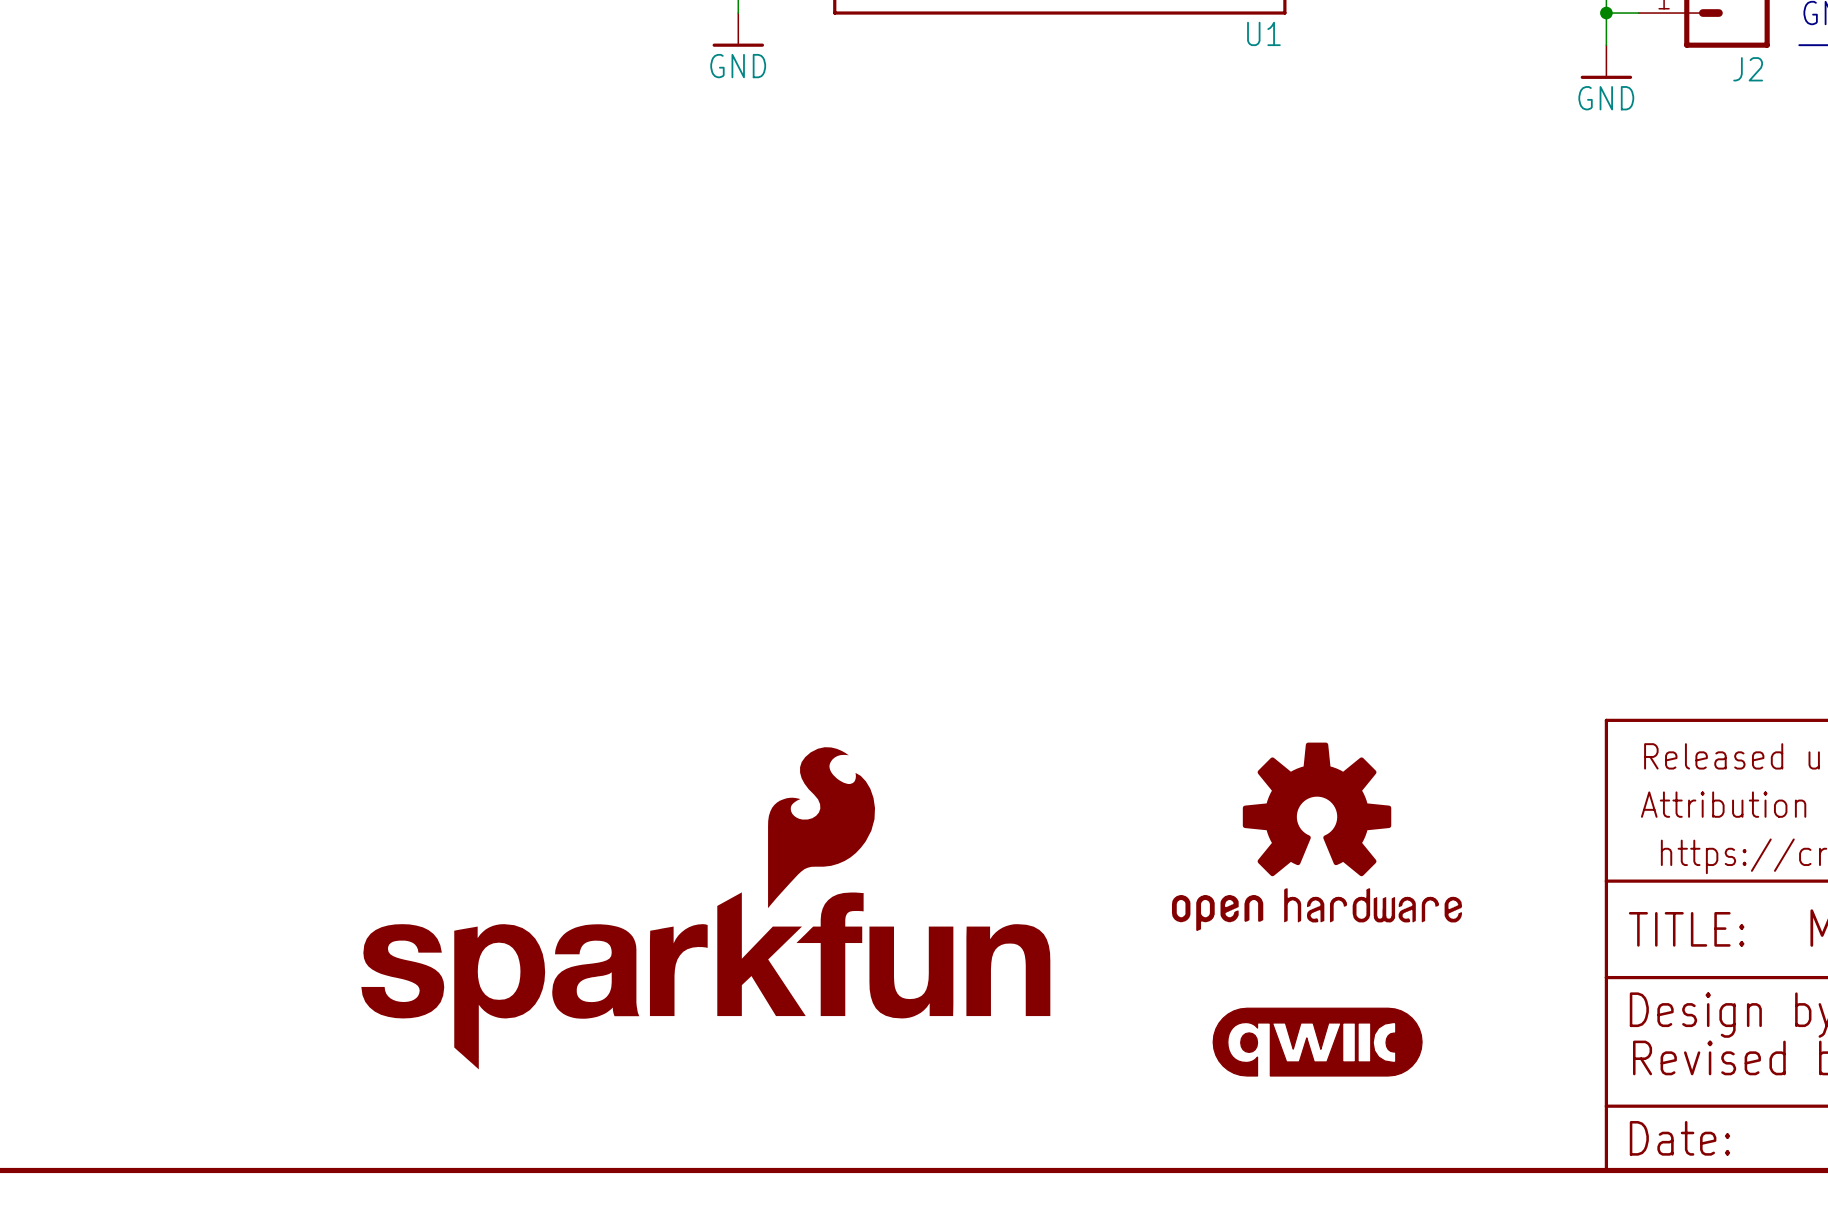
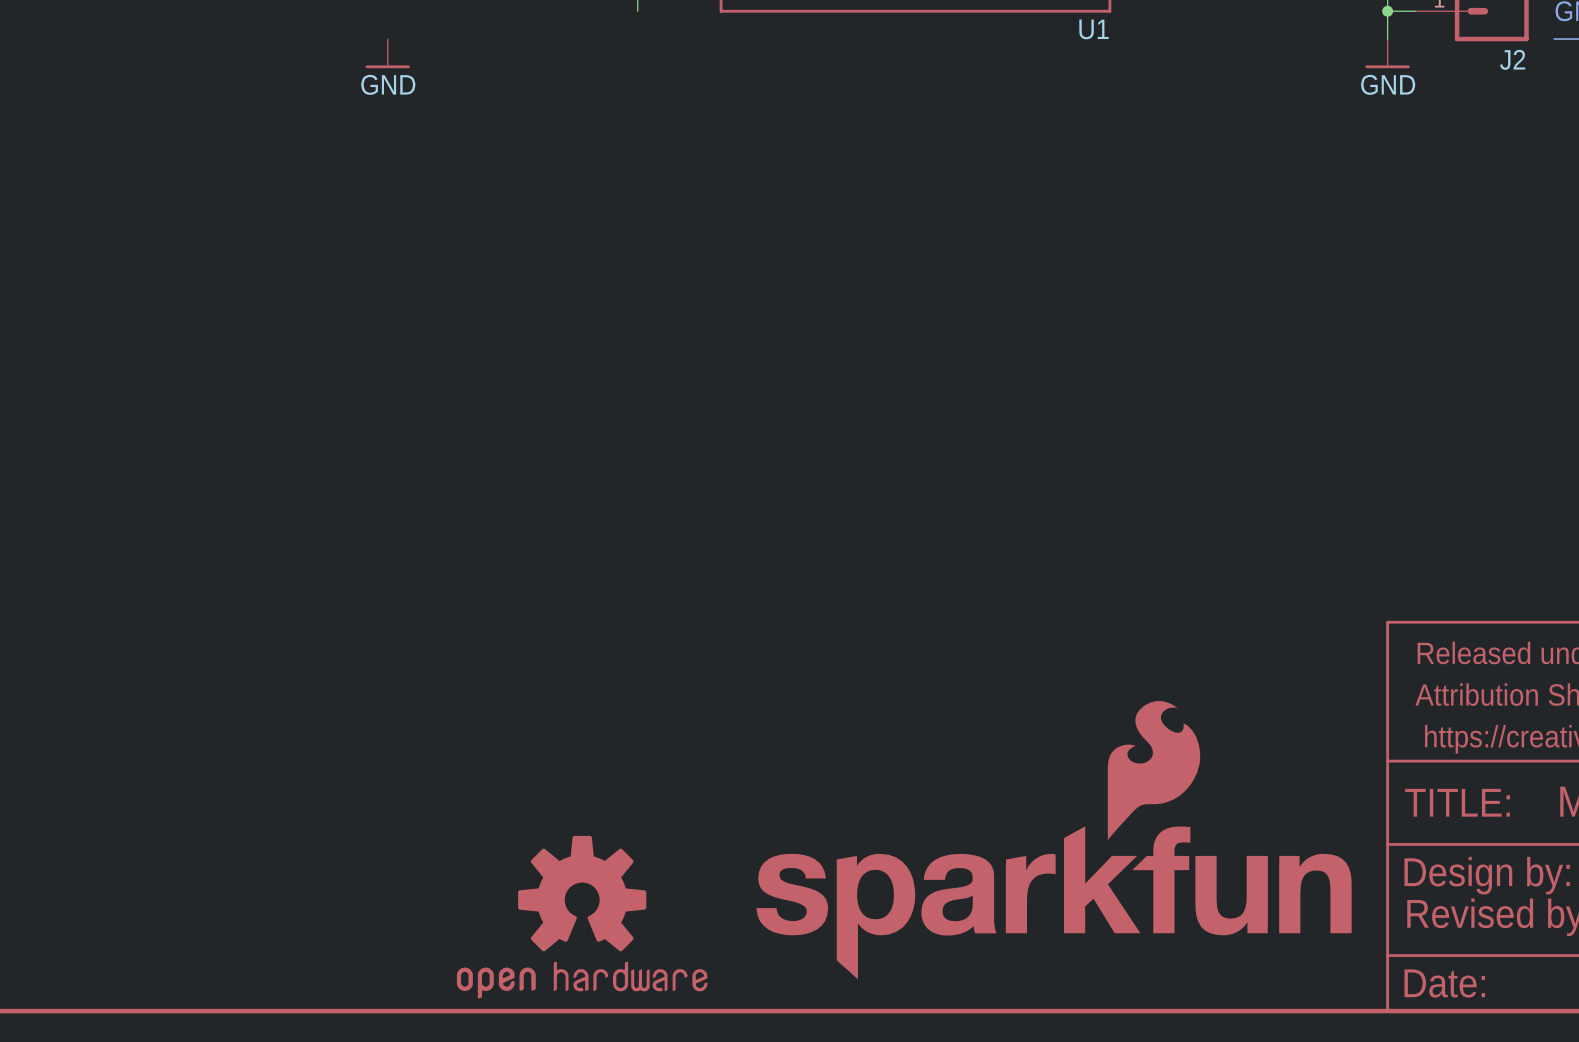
power symbol: GND (738, 29) -> none
power symbol: none -> GND (387, 53)
part: (1316, 836) -> none
part: (705, 908) -> none
part: none -> (1054, 840)
part: (1317, 1042) -> none
part: none -> (582, 917)

